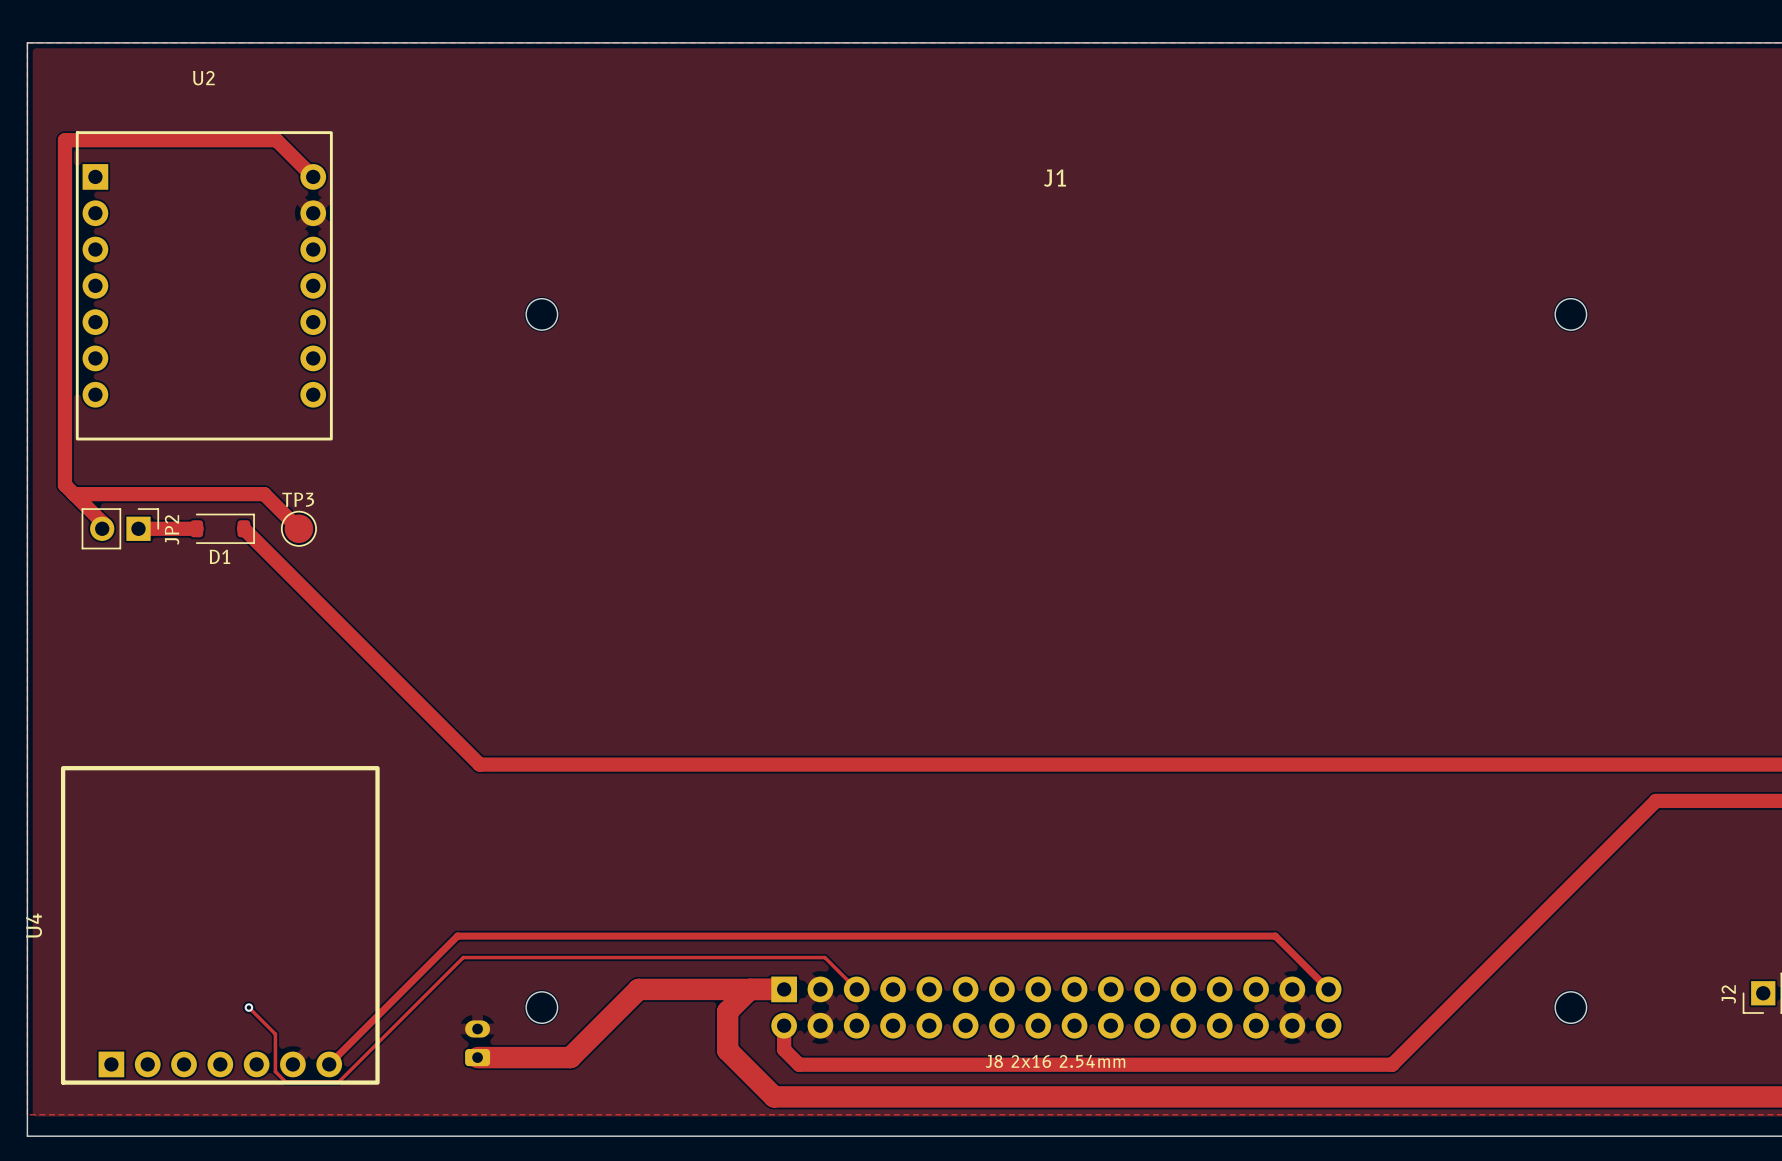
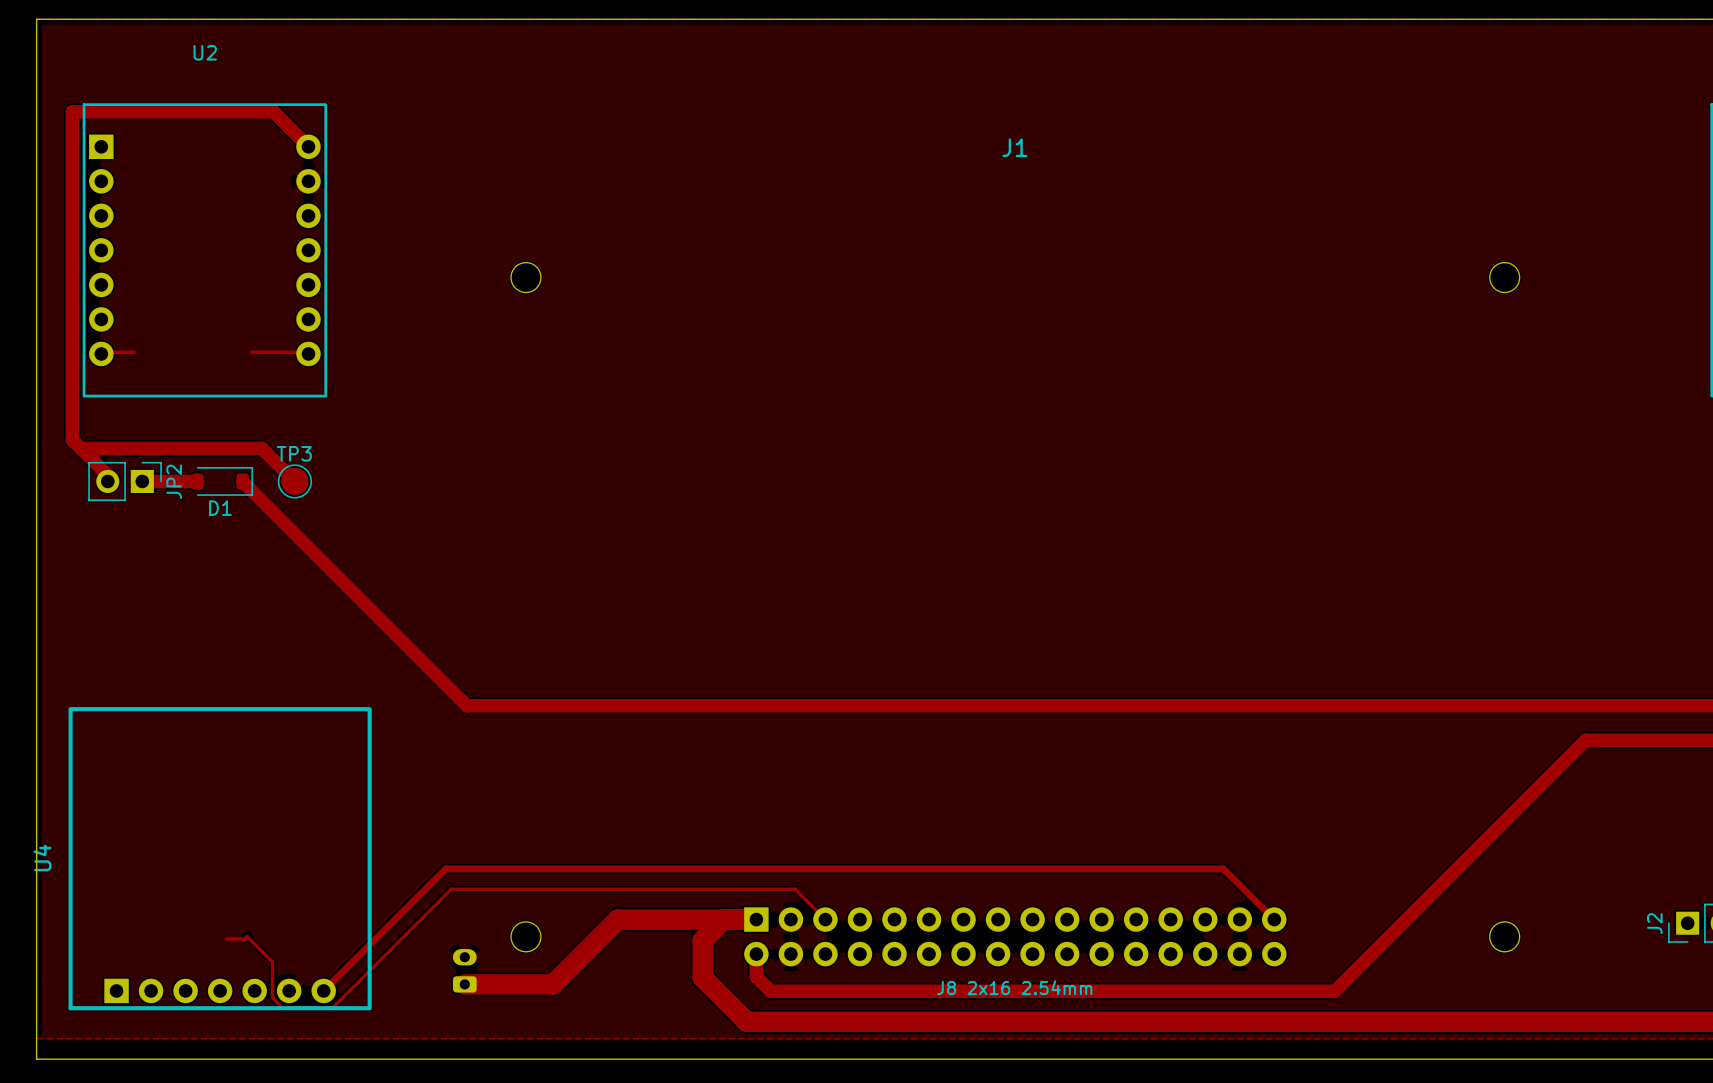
track: none -> (134, 352) (101, 353)
track: none -> (251, 352) (306, 352) (308, 353)
track: none -> (247, 936) (245, 938) (226, 938)
via: (248, 1007) -> none

